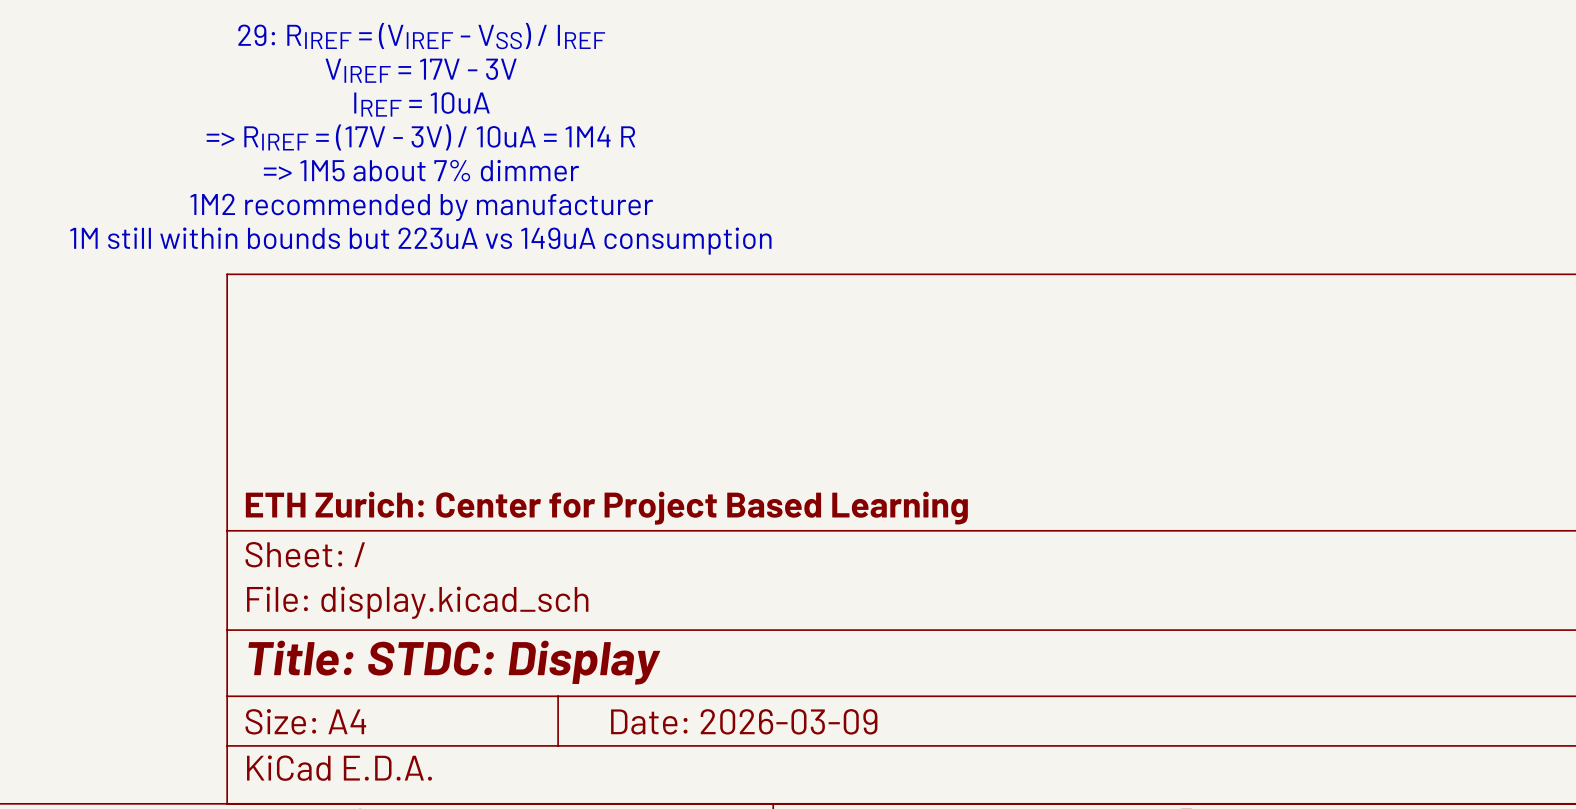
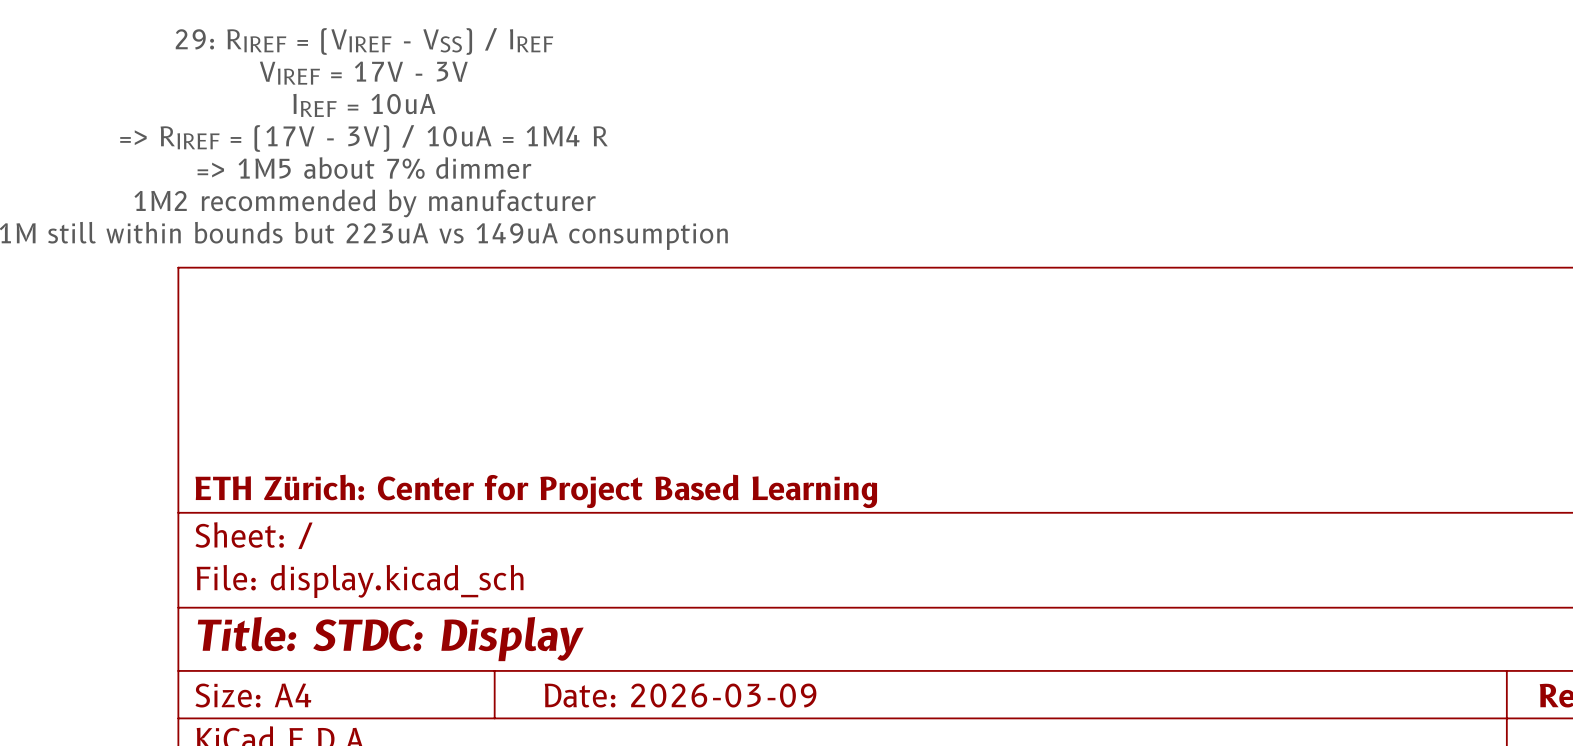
title block: ETH Zurich: Center for Project Based Learning (606, 508) -> ETH Zürich: Center for Project Based Learning (536, 491)

